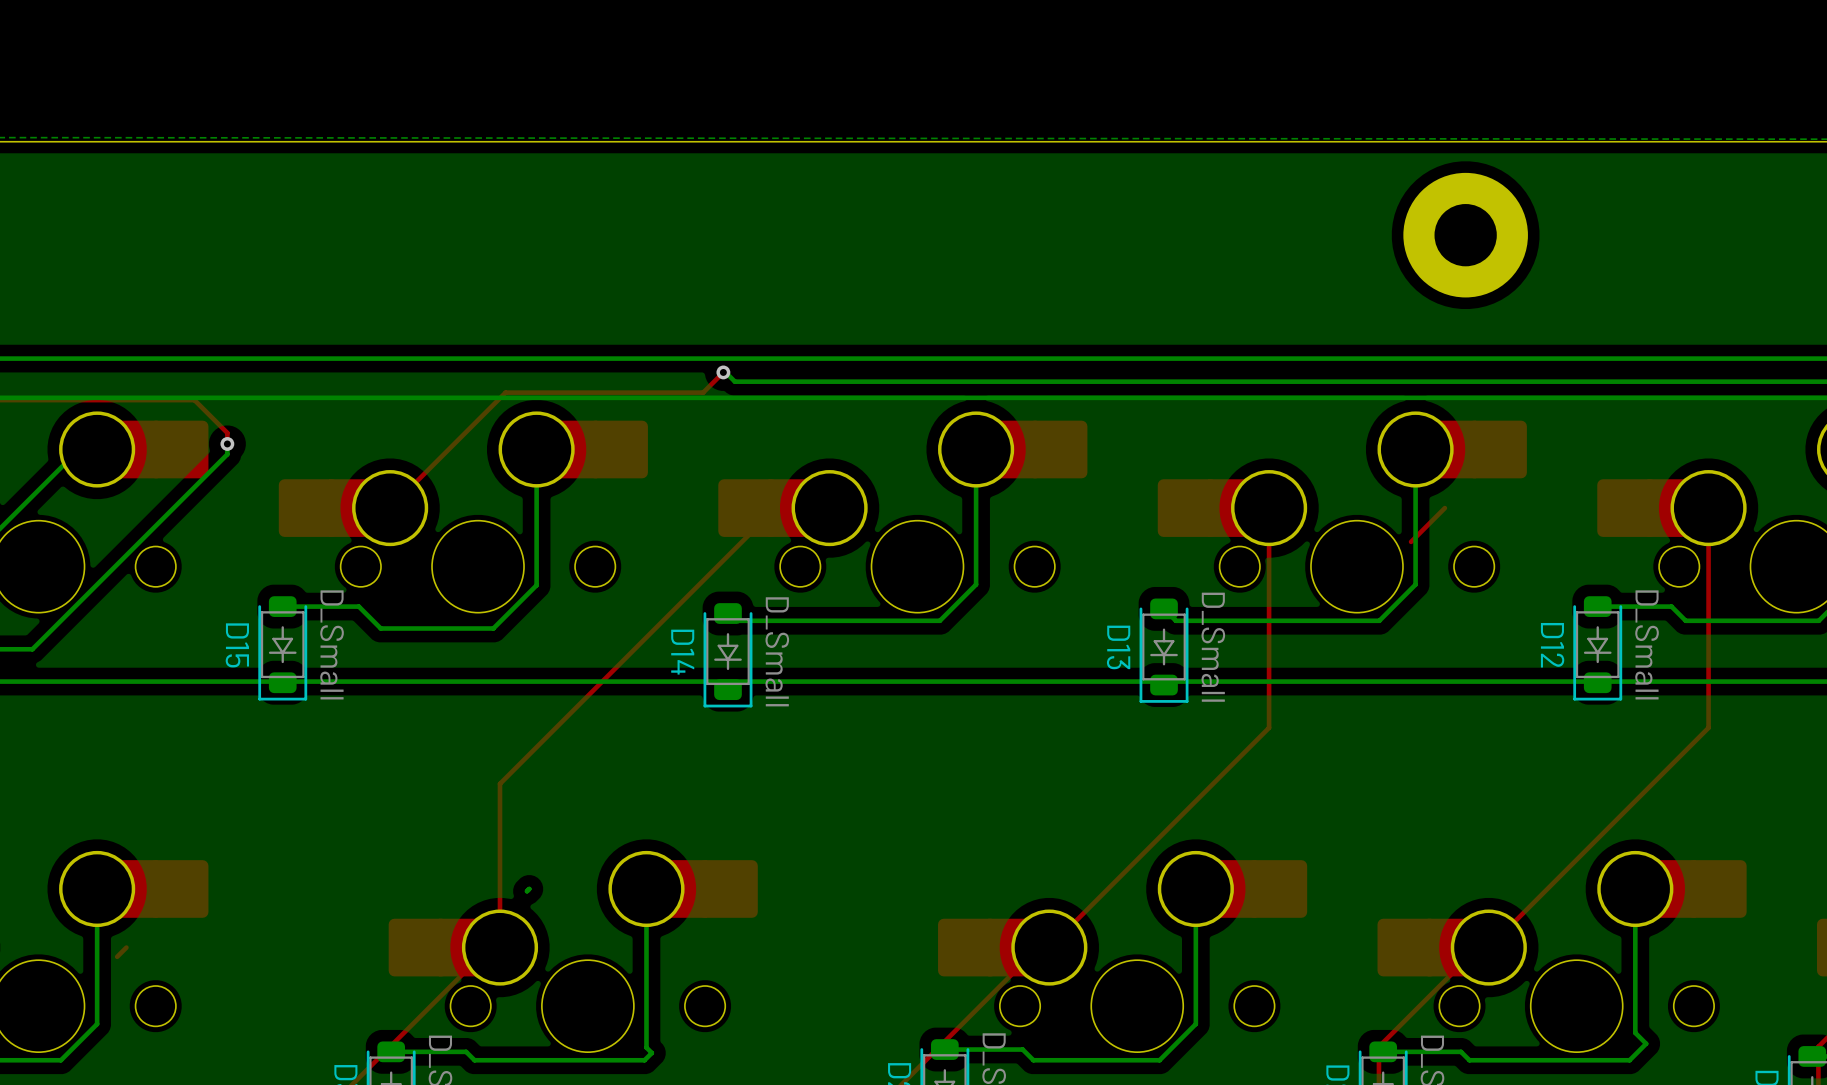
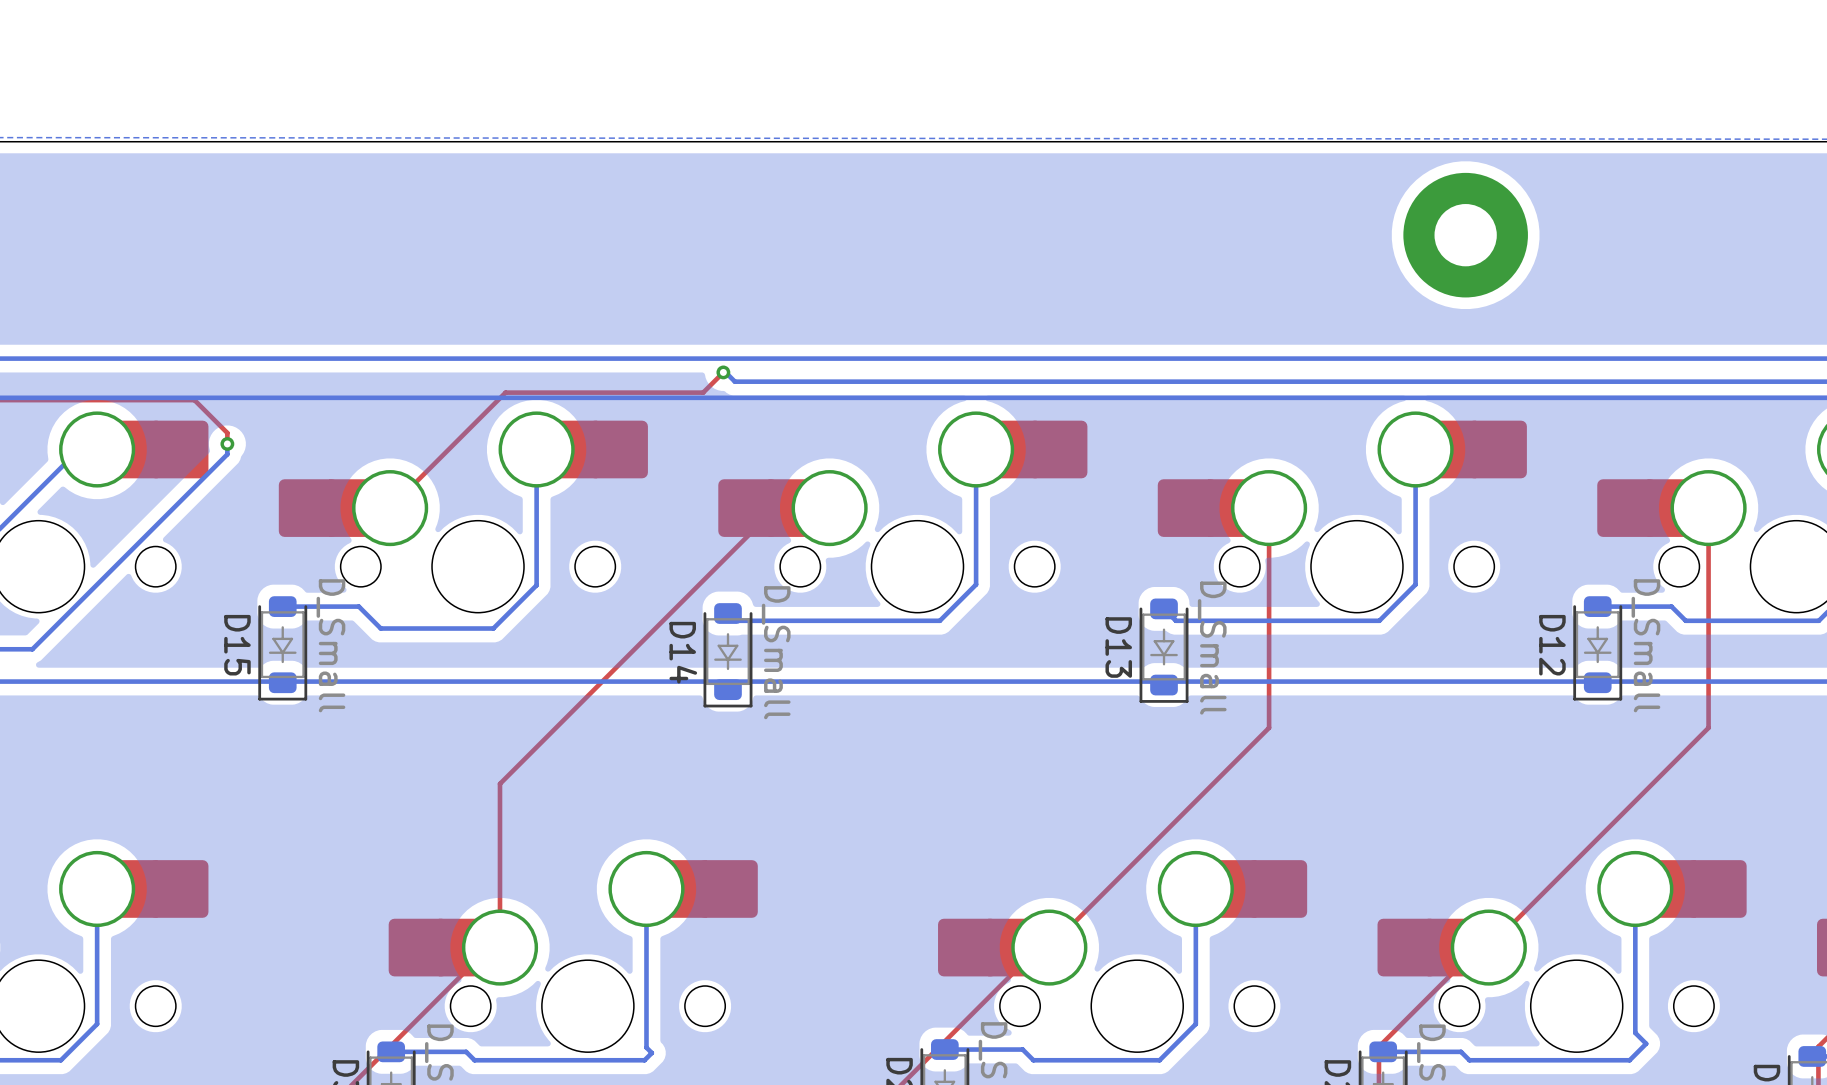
top track: (1444, 508) (1411, 541) -> none
bottom track: (529, 888) (527, 891) -> none
top track: (126, 947) (117, 956) -> none

